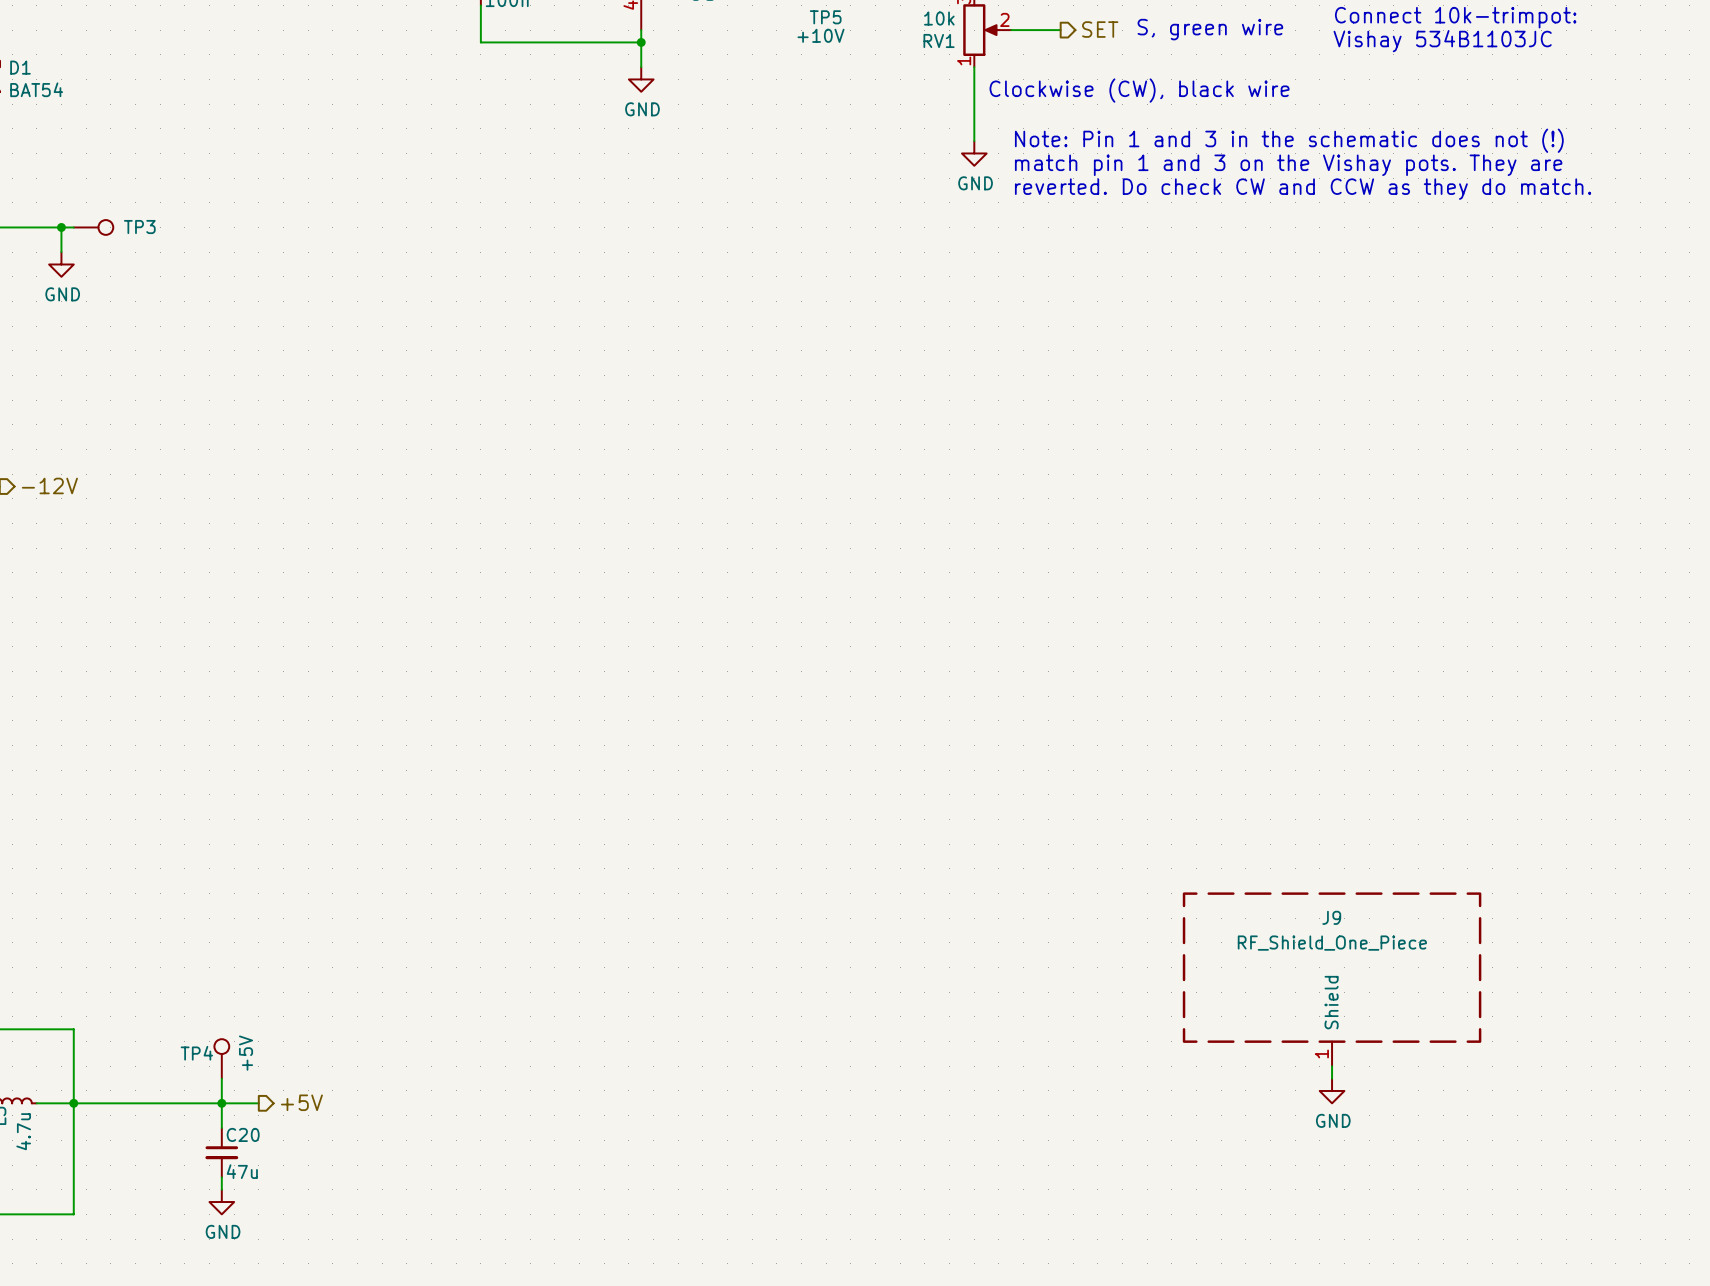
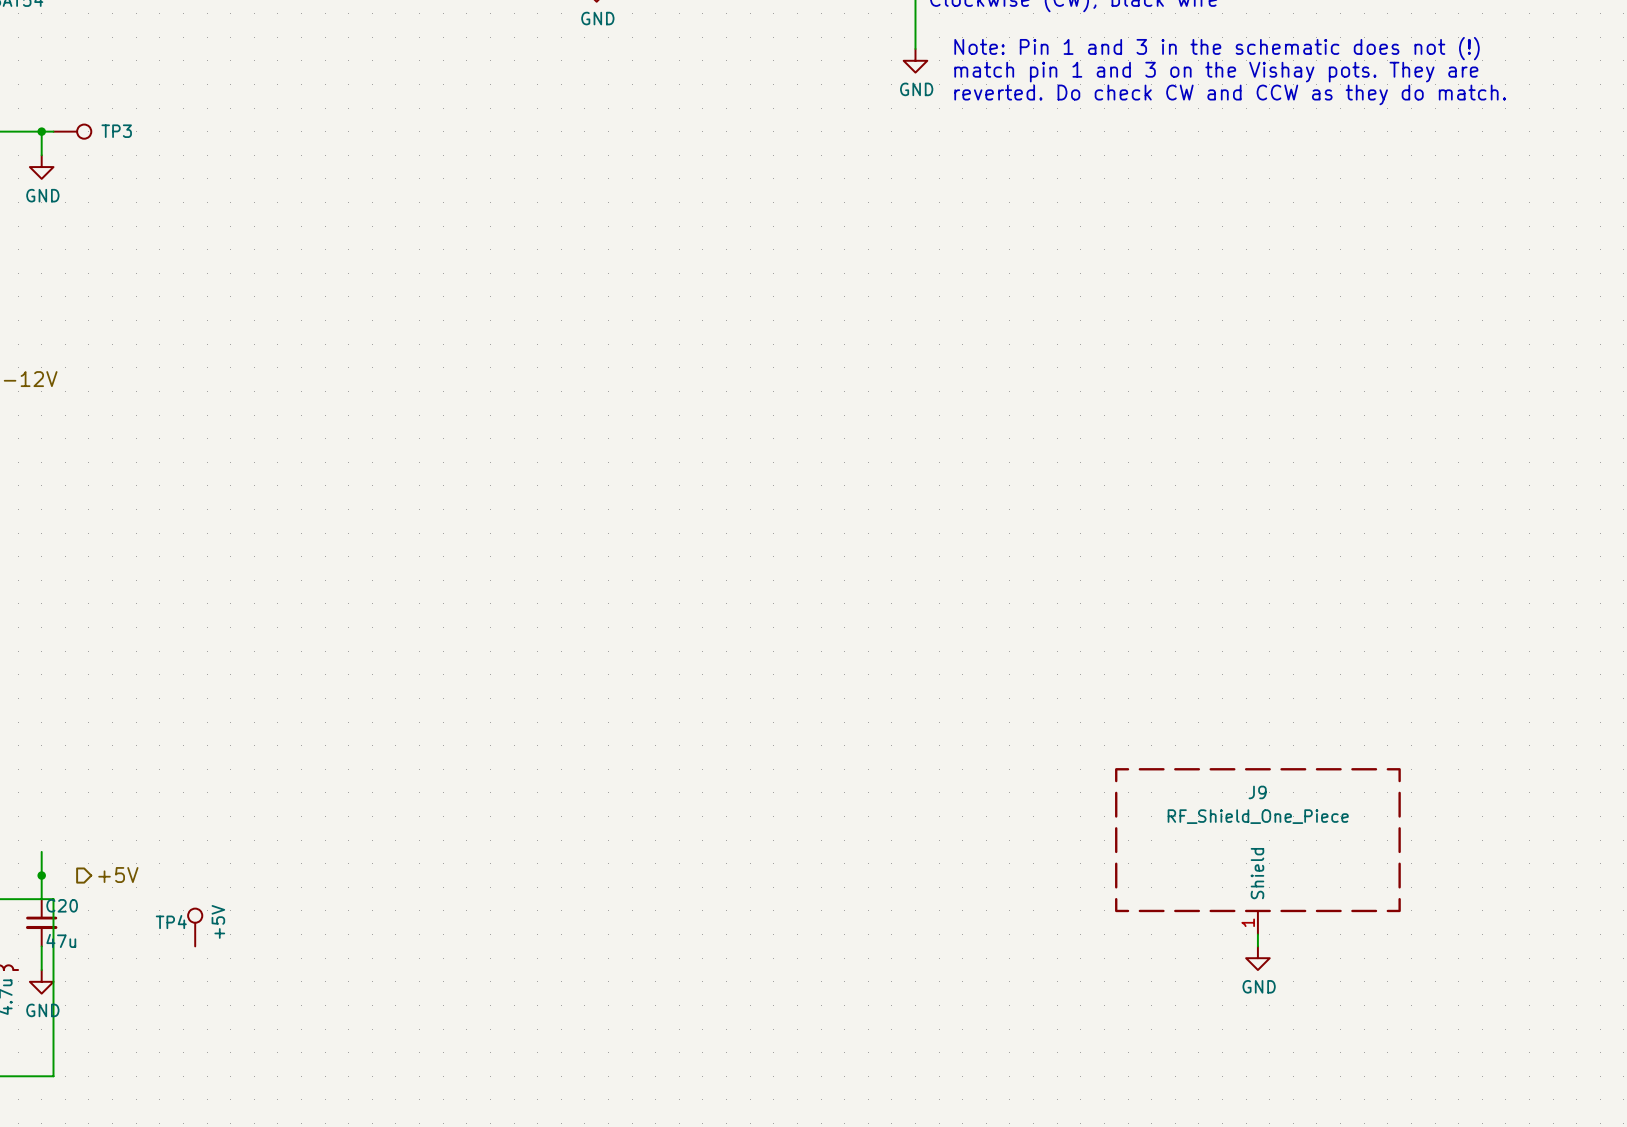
junction: none -> (41, 875)
wire: none -> (41, 946) (41, 970)
wire: (221, 1078) (221, 1128) -> (41, 851) (41, 899)
hierarchical label position: +5V (301, 1102) -> +5V (118, 875)
wire: (36, 1103) (258, 1103) -> none
junction: (73, 1103) -> none
junction: (221, 1103) -> none
power symbol: none -> GND (41, 981)
C20 position: (221, 1152) -> (41, 922)
wire: (221, 1177) (221, 1189) -> none
power symbol: GND (221, 1202) -> none

